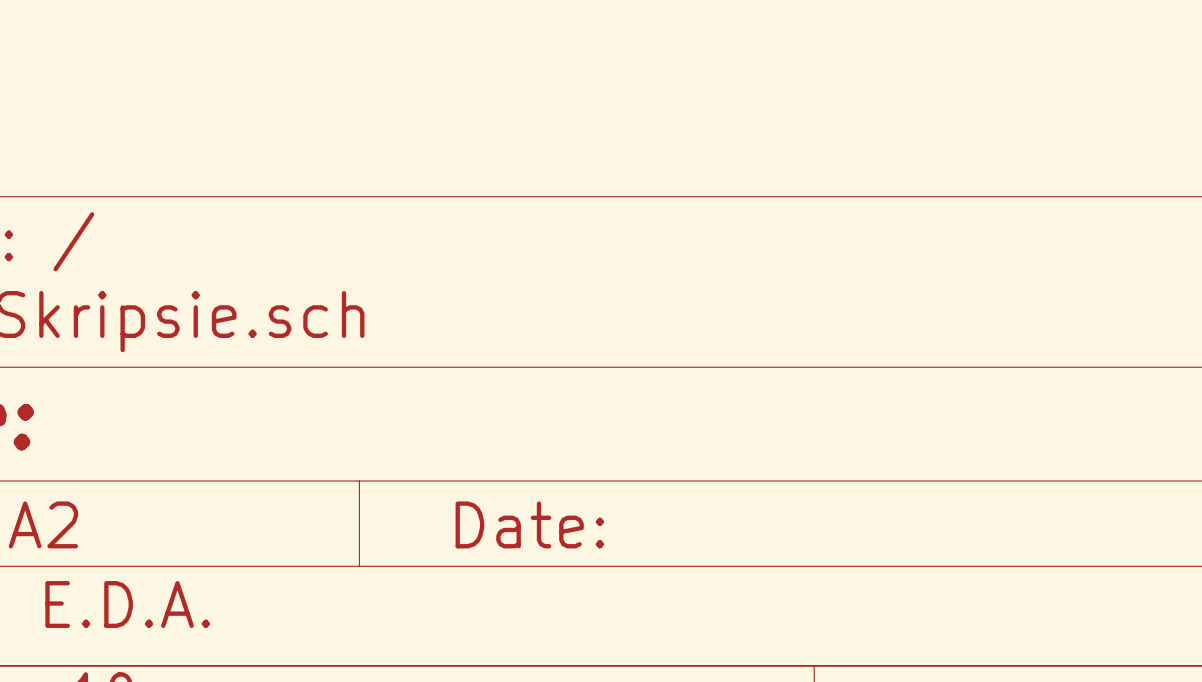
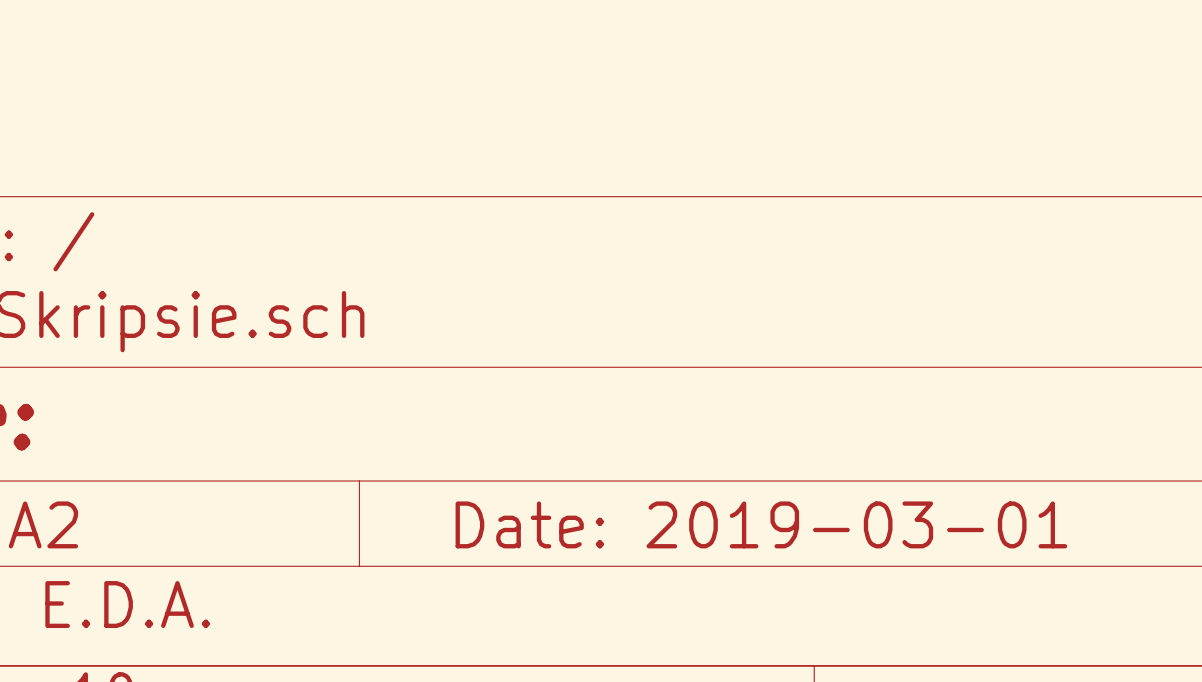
title block: Date: (529, 524) -> Date: 2019-03-01 (761, 524)

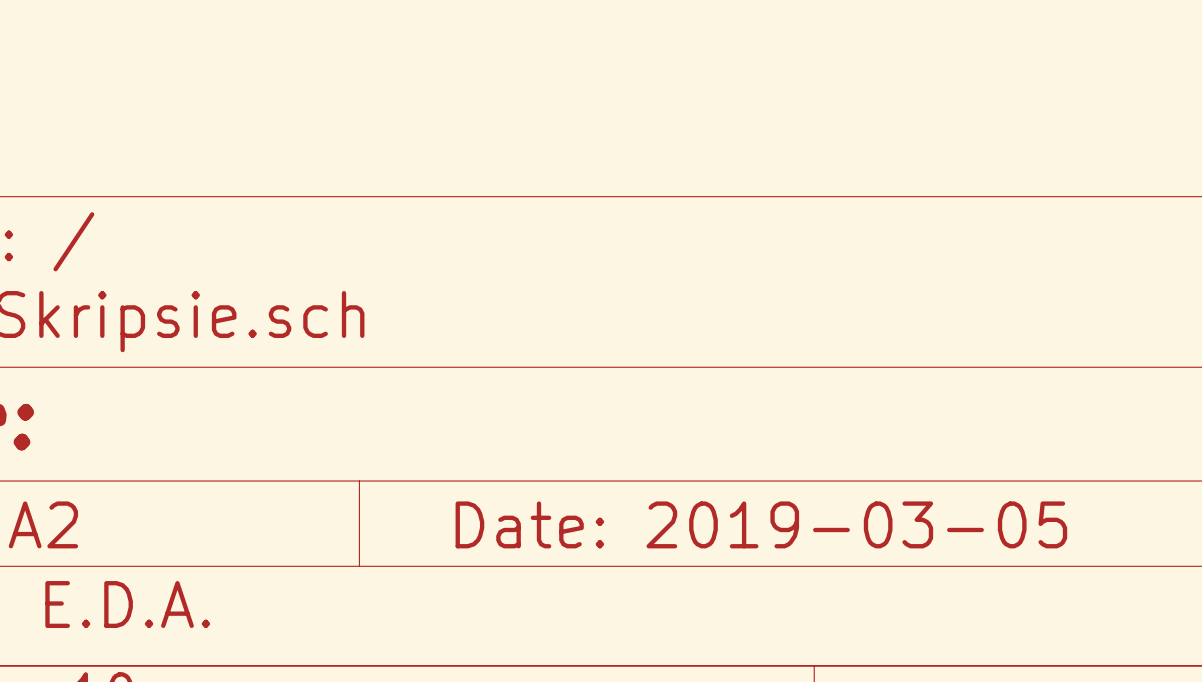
title block: Date: 2019-03-01 (761, 524) -> Date: 2019-03-05 (761, 524)

